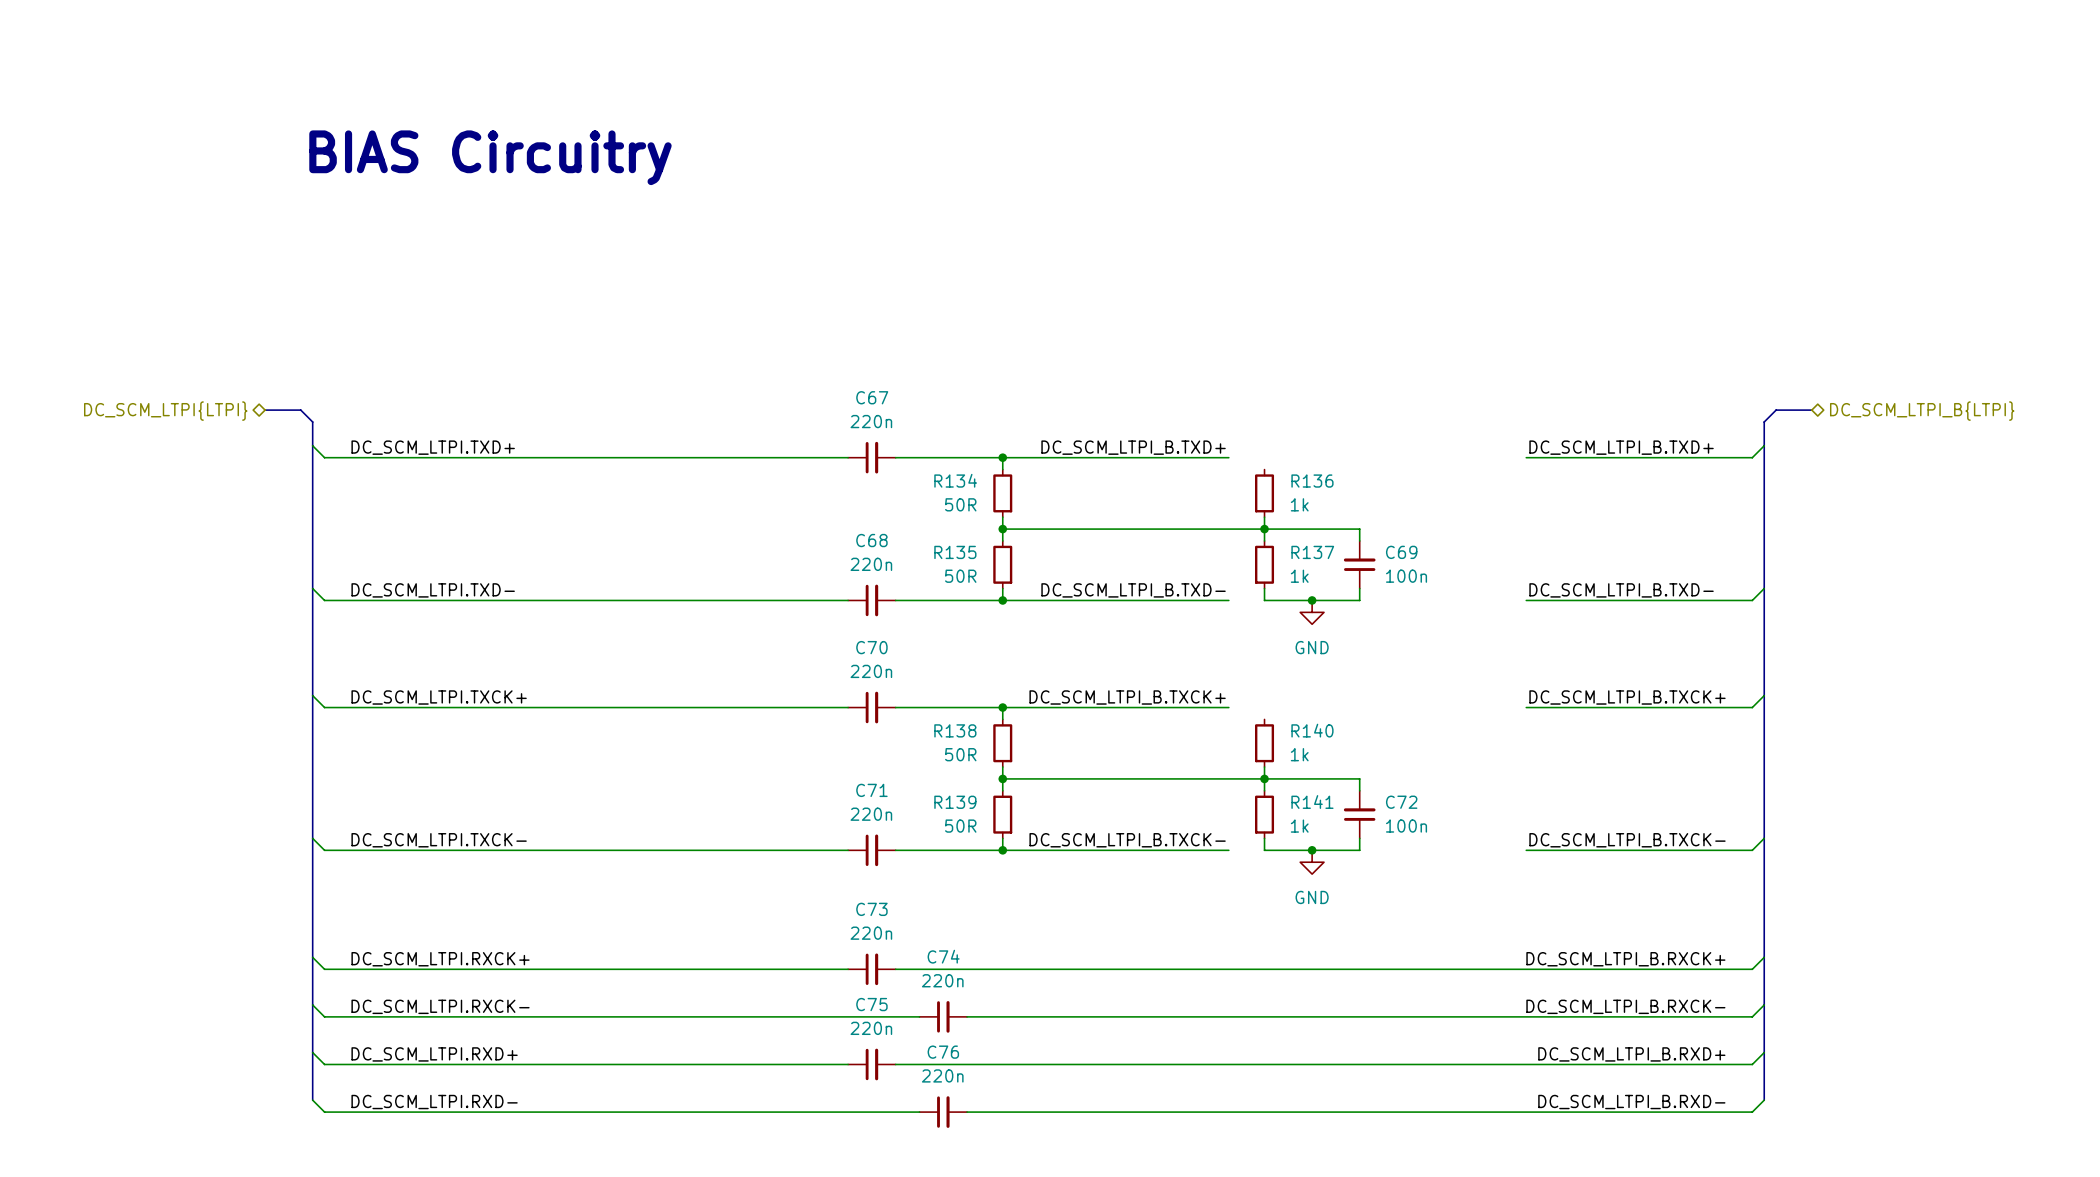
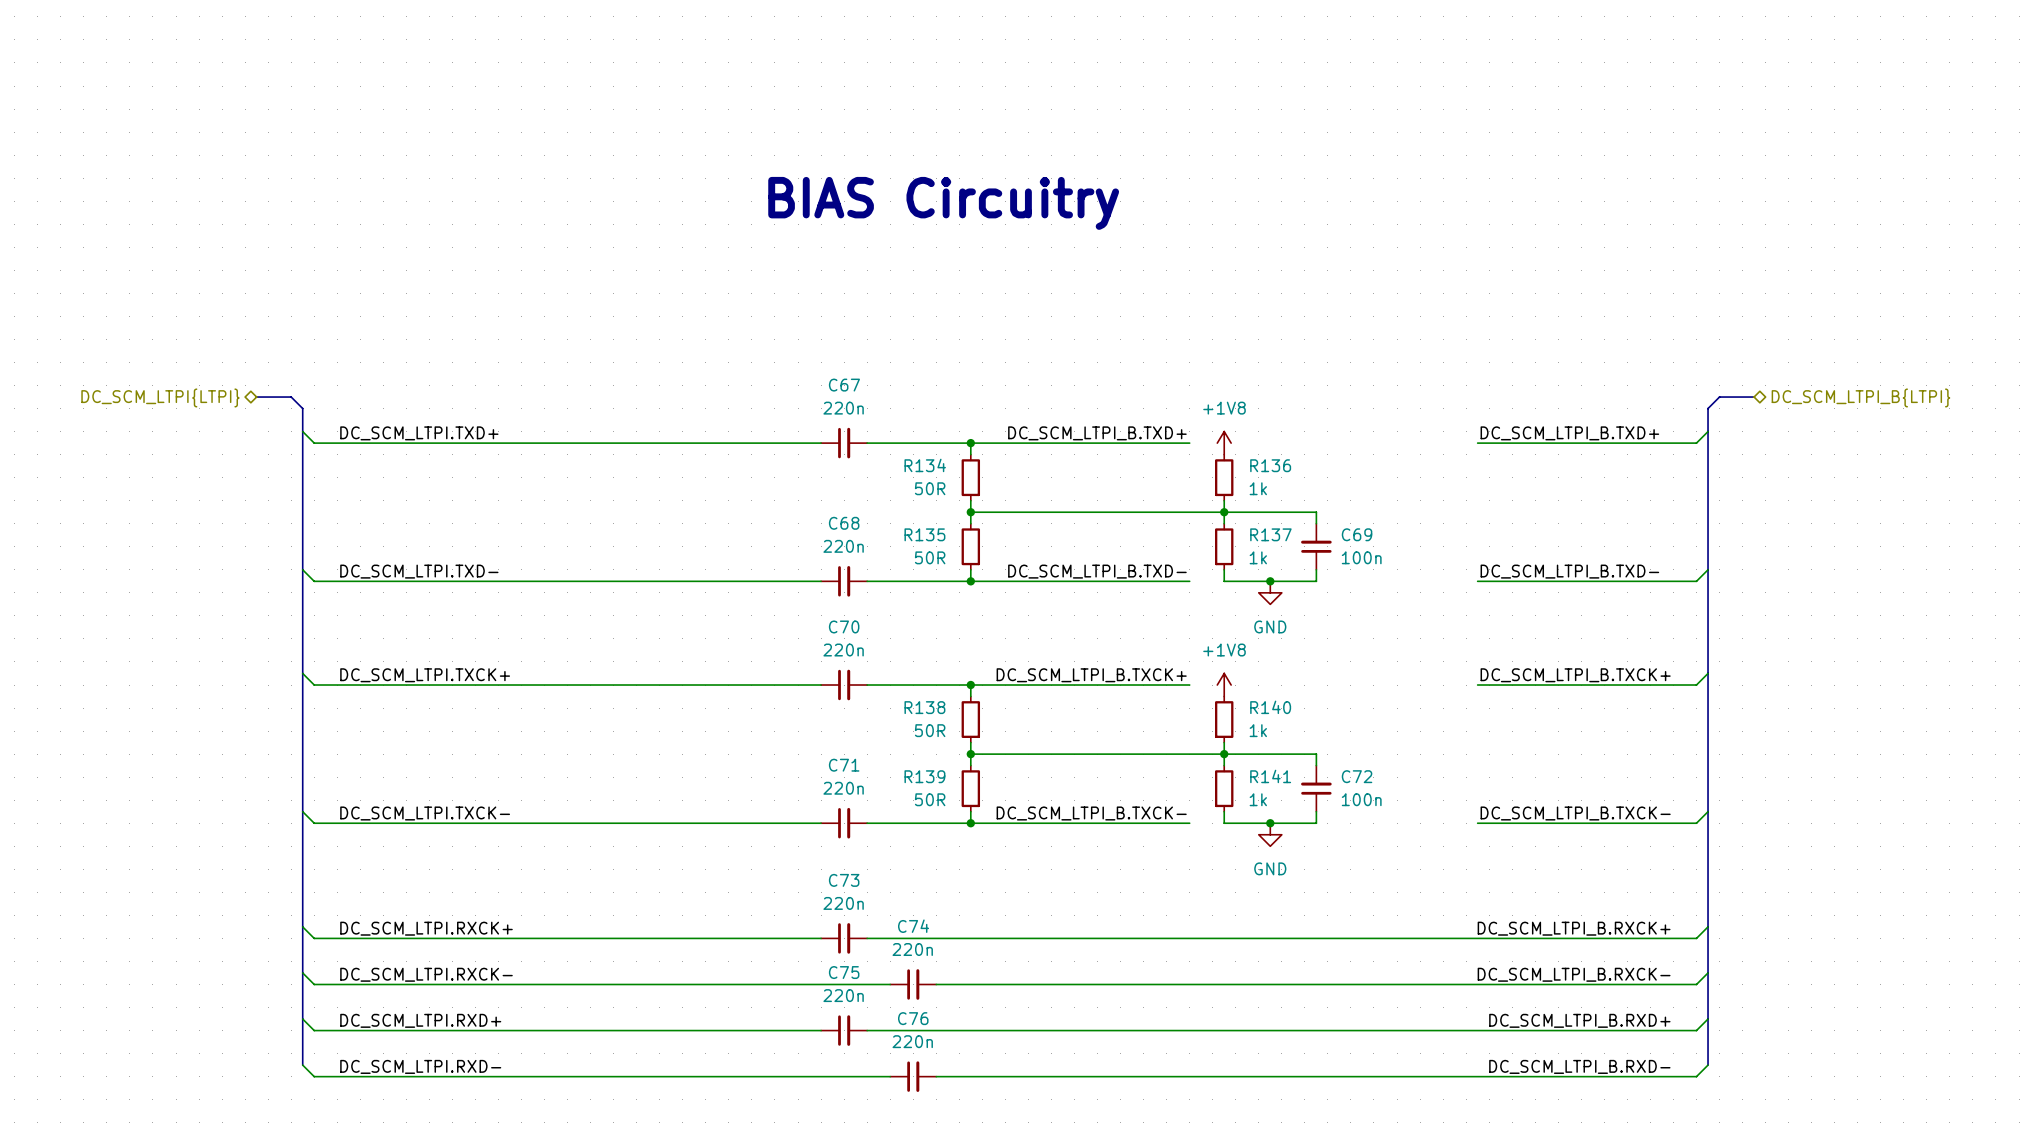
text: BIAS Circuitry (490, 157) -> none
text: none -> BIAS Circuitry (943, 203)
power symbol: none -> +1V8 (1224, 443)
power symbol: none -> +1V8 (1224, 685)

